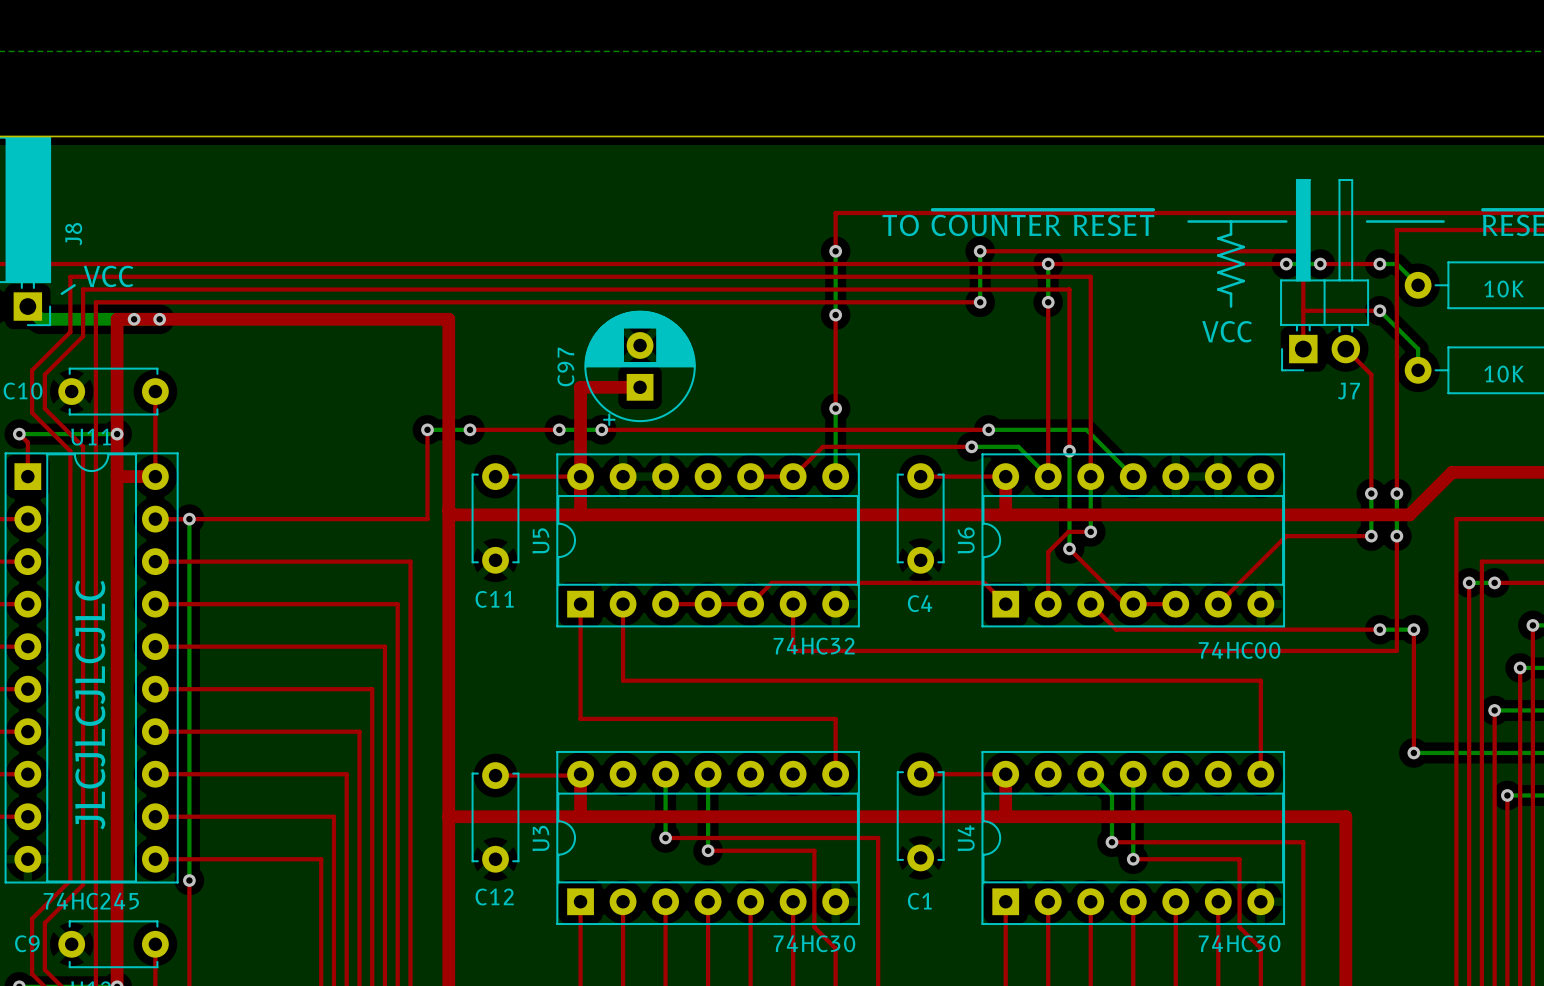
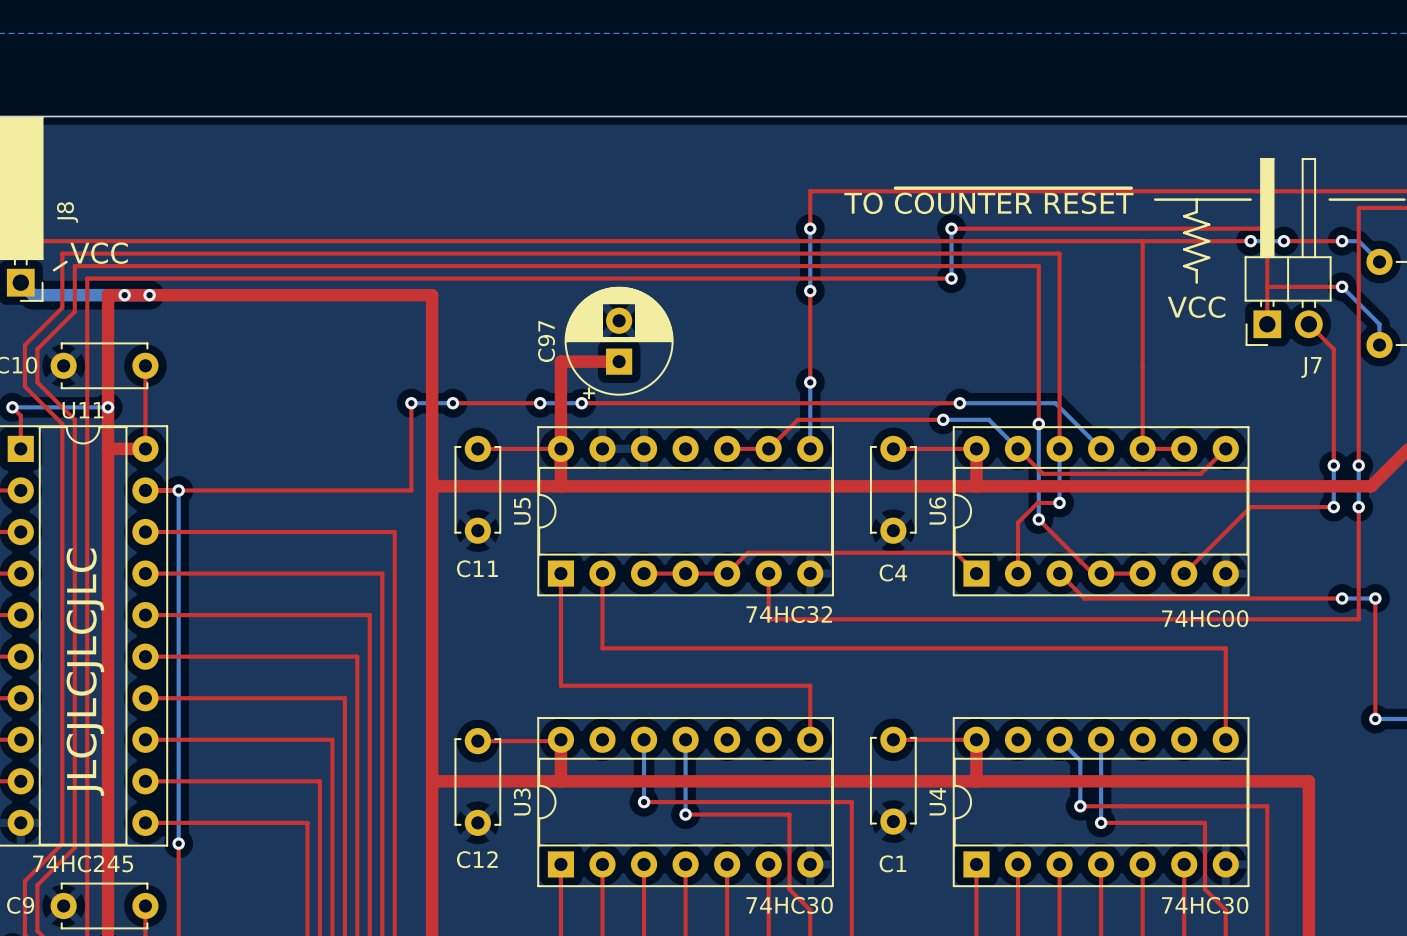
bottom track: (1048, 264) (1048, 302) -> none
via: (1048, 264) -> none
top track: none -> (1142, 241) (1142, 448) (1184, 448)
top track: (1048, 302) (1048, 476) -> (1225, 448) (1200, 473) (1042, 473) (1018, 448)
via: (1048, 302) -> none

